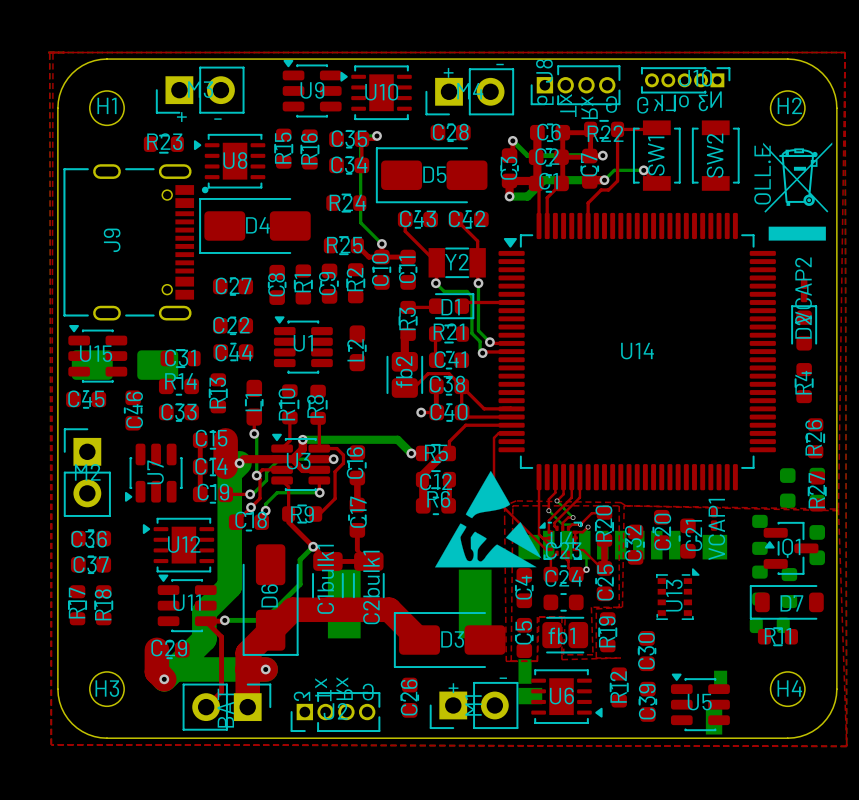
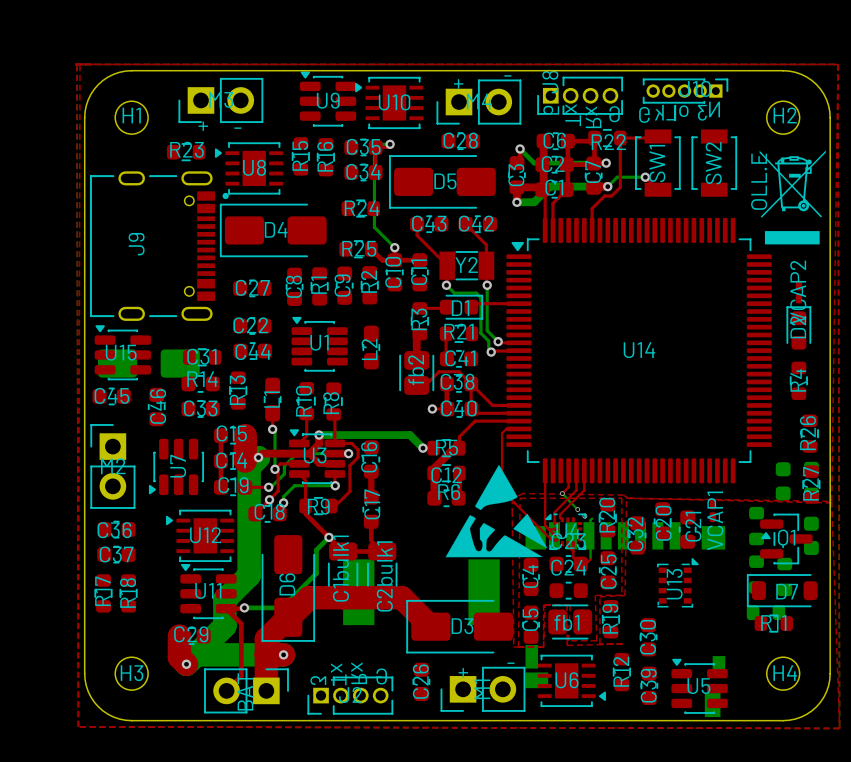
top track: (555, 477) (555, 492) (548, 499) (548, 510) -> none
bottom track: (548, 510) (562, 524) (580, 524) -> none
via: (548, 510) -> none
top track: (604, 513) (591, 513) (580, 524) (572, 524) (568, 528) -> none
top track: (573, 517) (568, 517) (562, 523) (562, 528) -> none
top track: (587, 527) (582, 532) (575, 532) (575, 543) -> none
via: (588, 527) -> none
top track: (604, 540) (604, 568) (601, 568) (583, 550) (575, 549) -> none
top track: (556, 553) (550, 559) (550, 574) -> none
via: (586, 569) -> none

